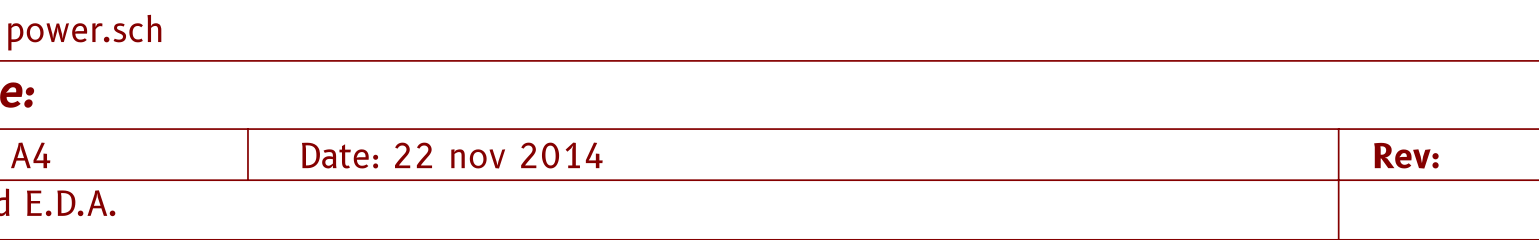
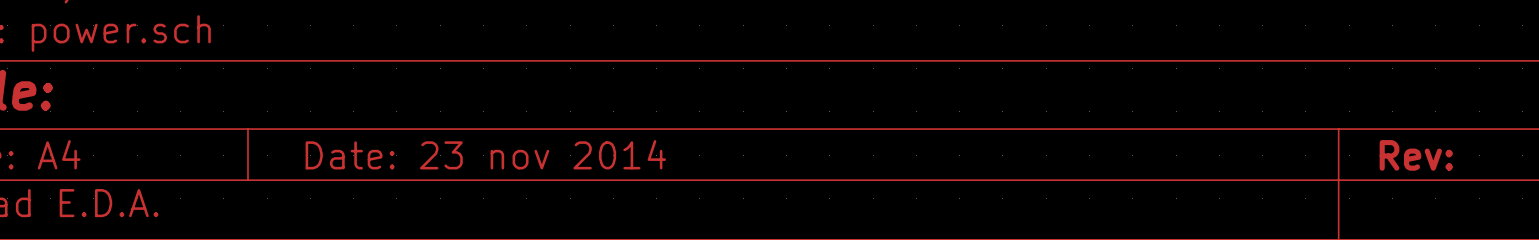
title block: Date: 22 nov 2014 (452, 155) -> Date: 23 nov 2014 (485, 154)

